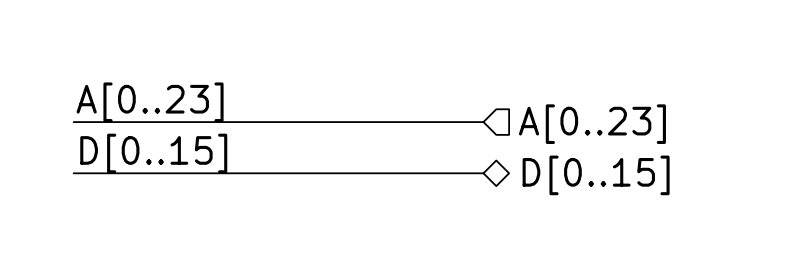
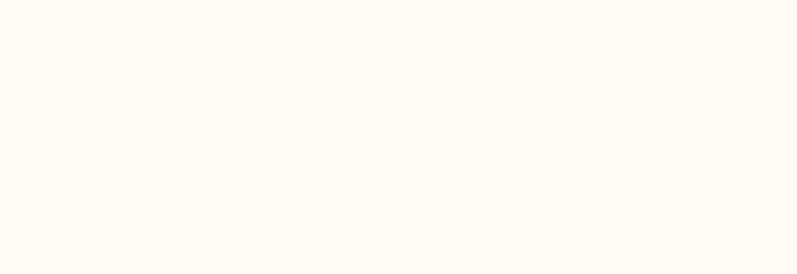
label: A[0..23] (150, 102) -> none
bus: (73, 122) (483, 122) -> none
hierarchical label: A[0..23] (592, 124) -> none
label: D[0..15] (153, 153) -> none
bus: (73, 173) (483, 173) -> none
hierarchical label: D[0..15] (596, 175) -> none

